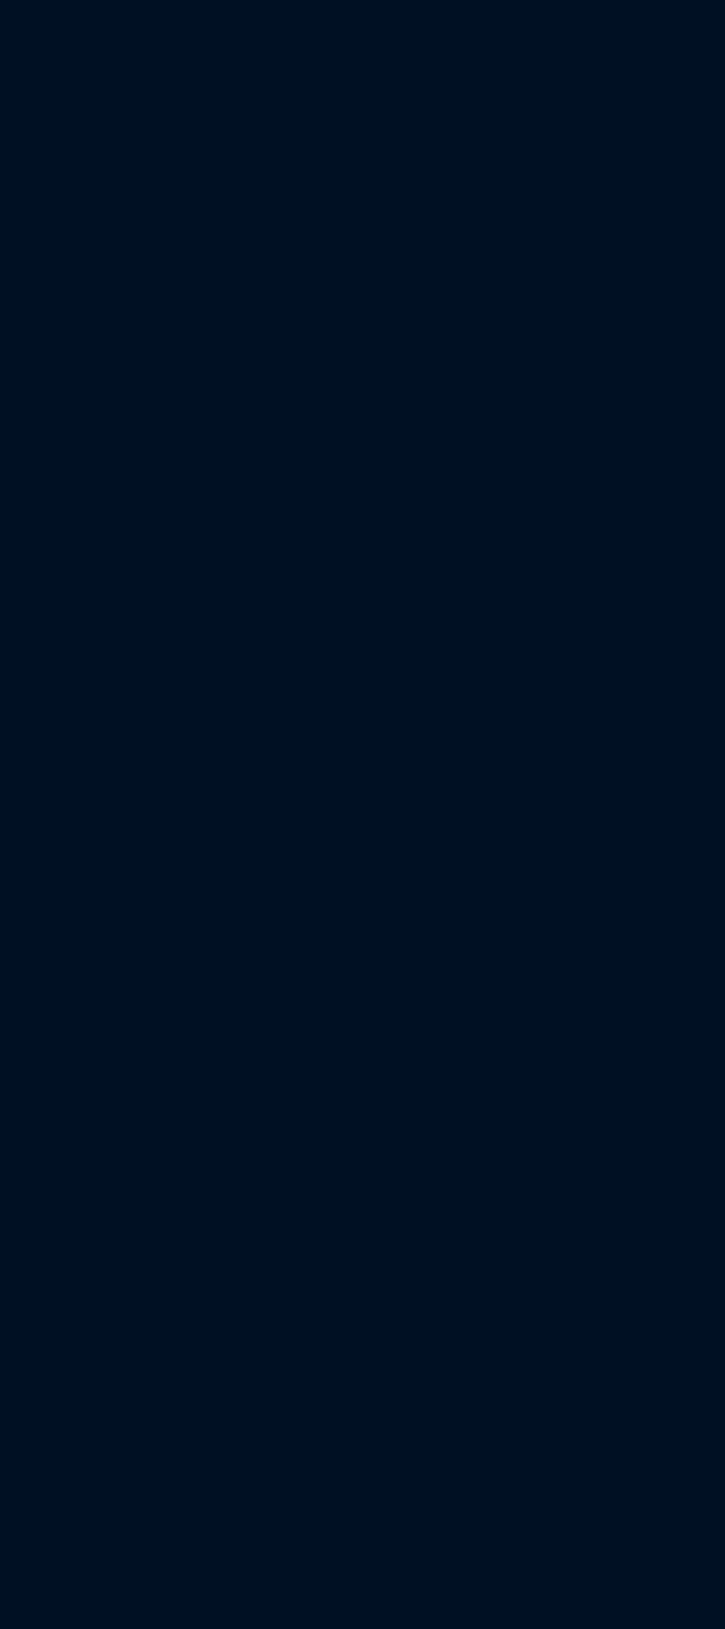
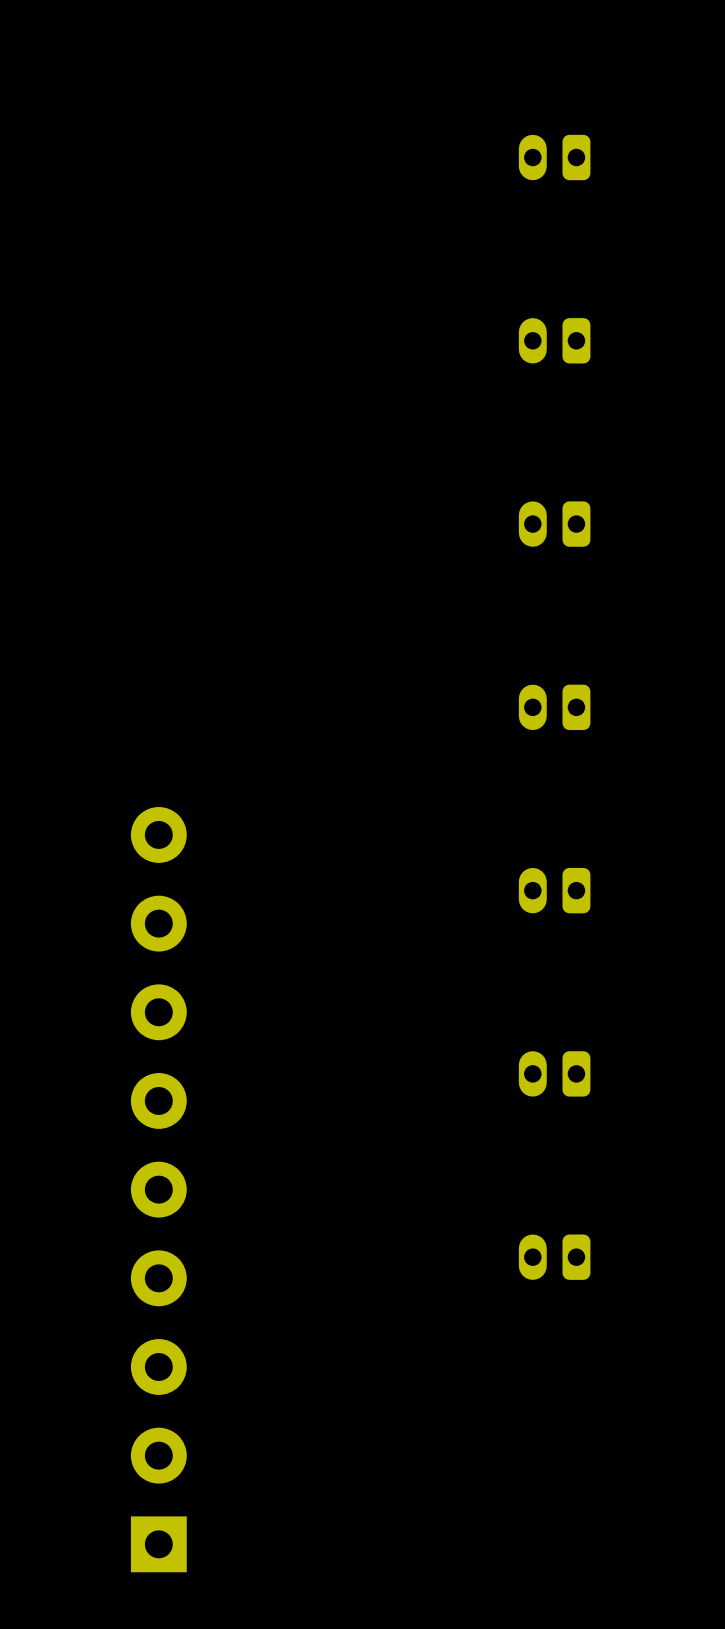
part: none -> (554, 157)
part: none -> (554, 340)
part: none -> (554, 524)
part: none -> (554, 707)
part: none -> (554, 890)
part: none -> (554, 1073)
part: none -> (158, 1189)
part: none -> (554, 1257)

